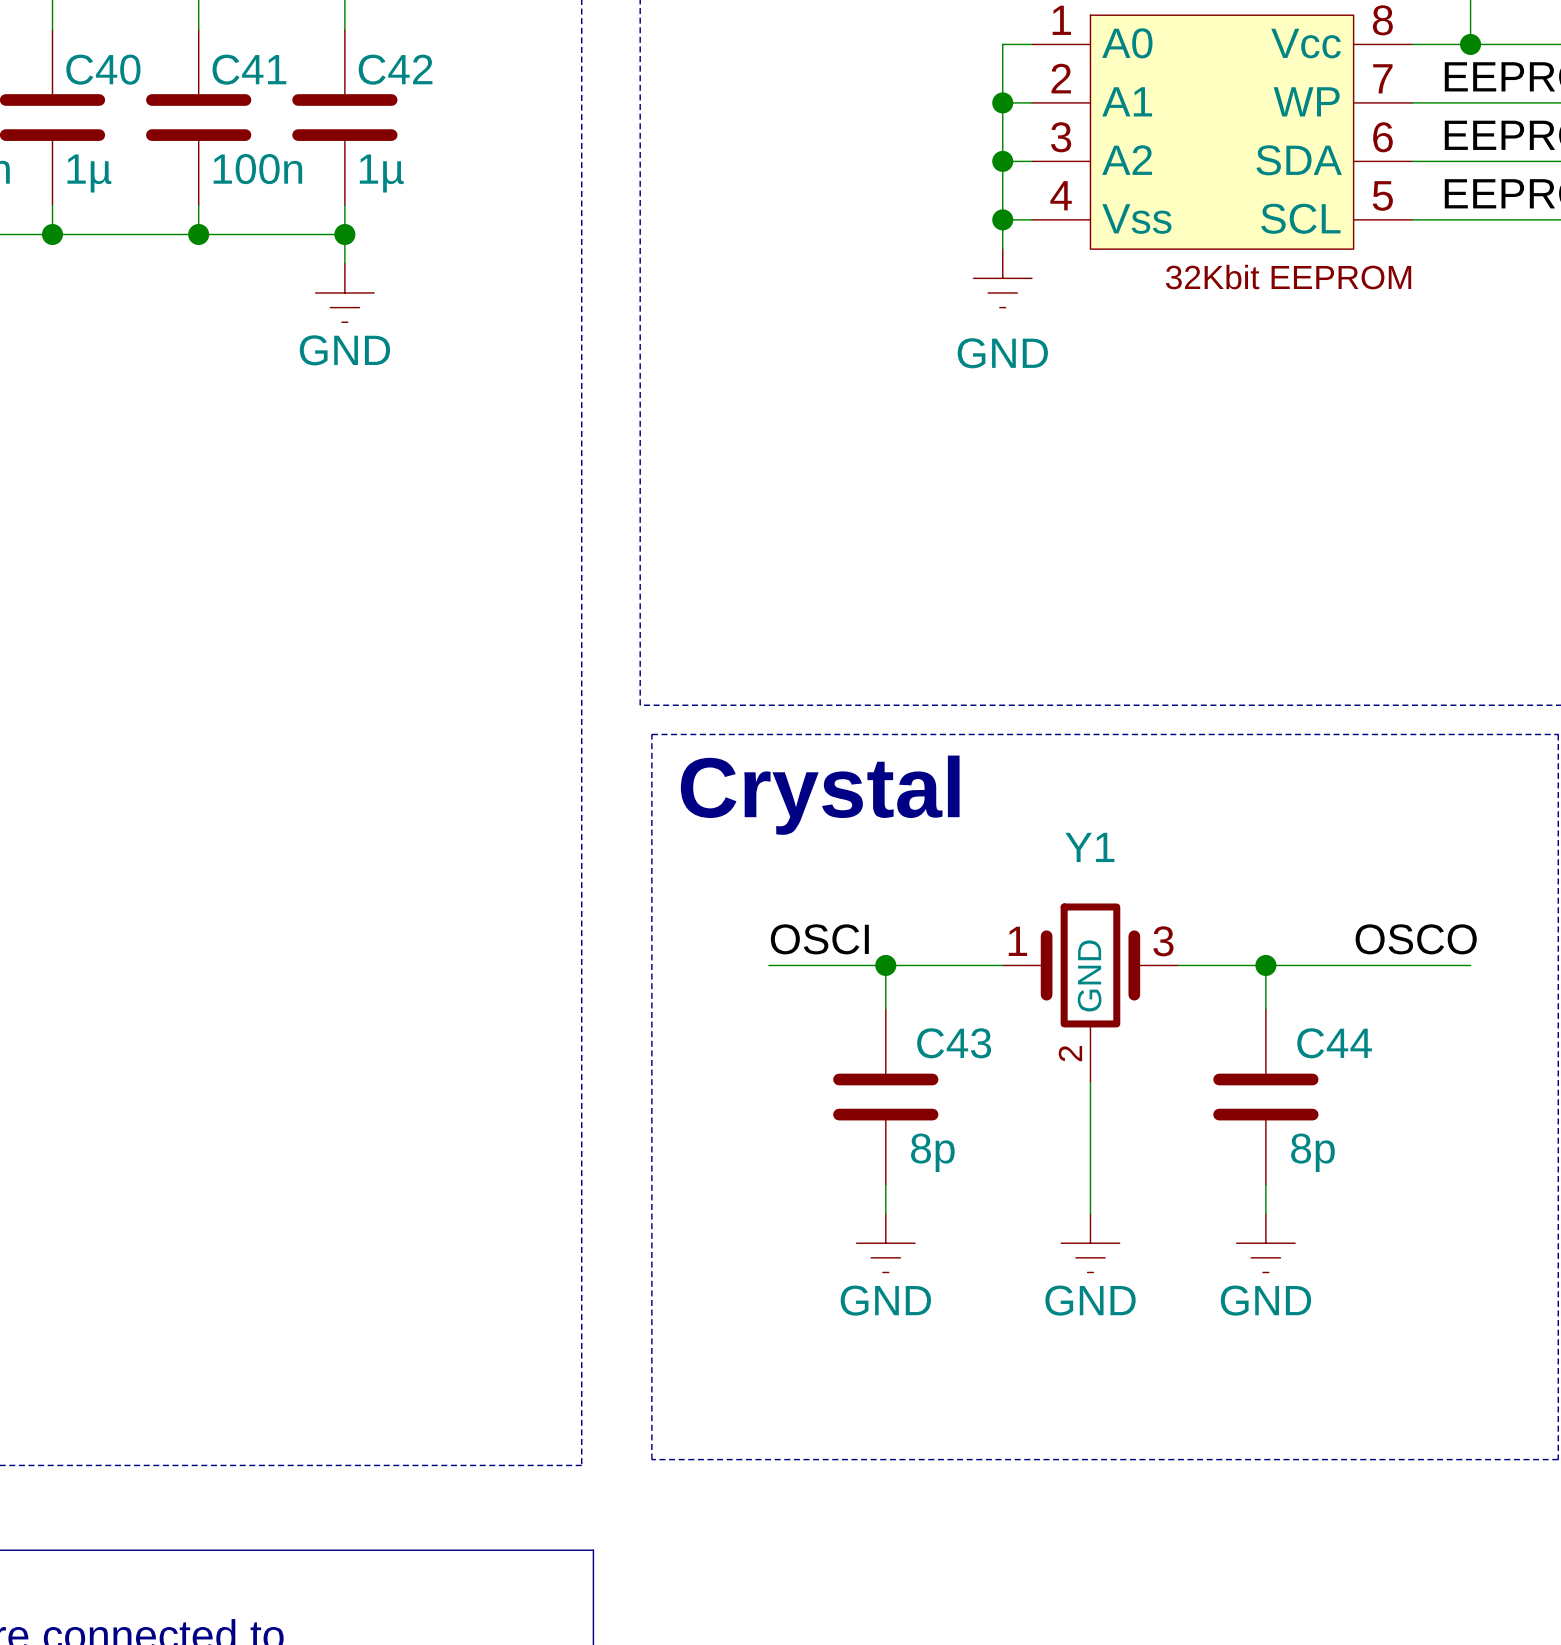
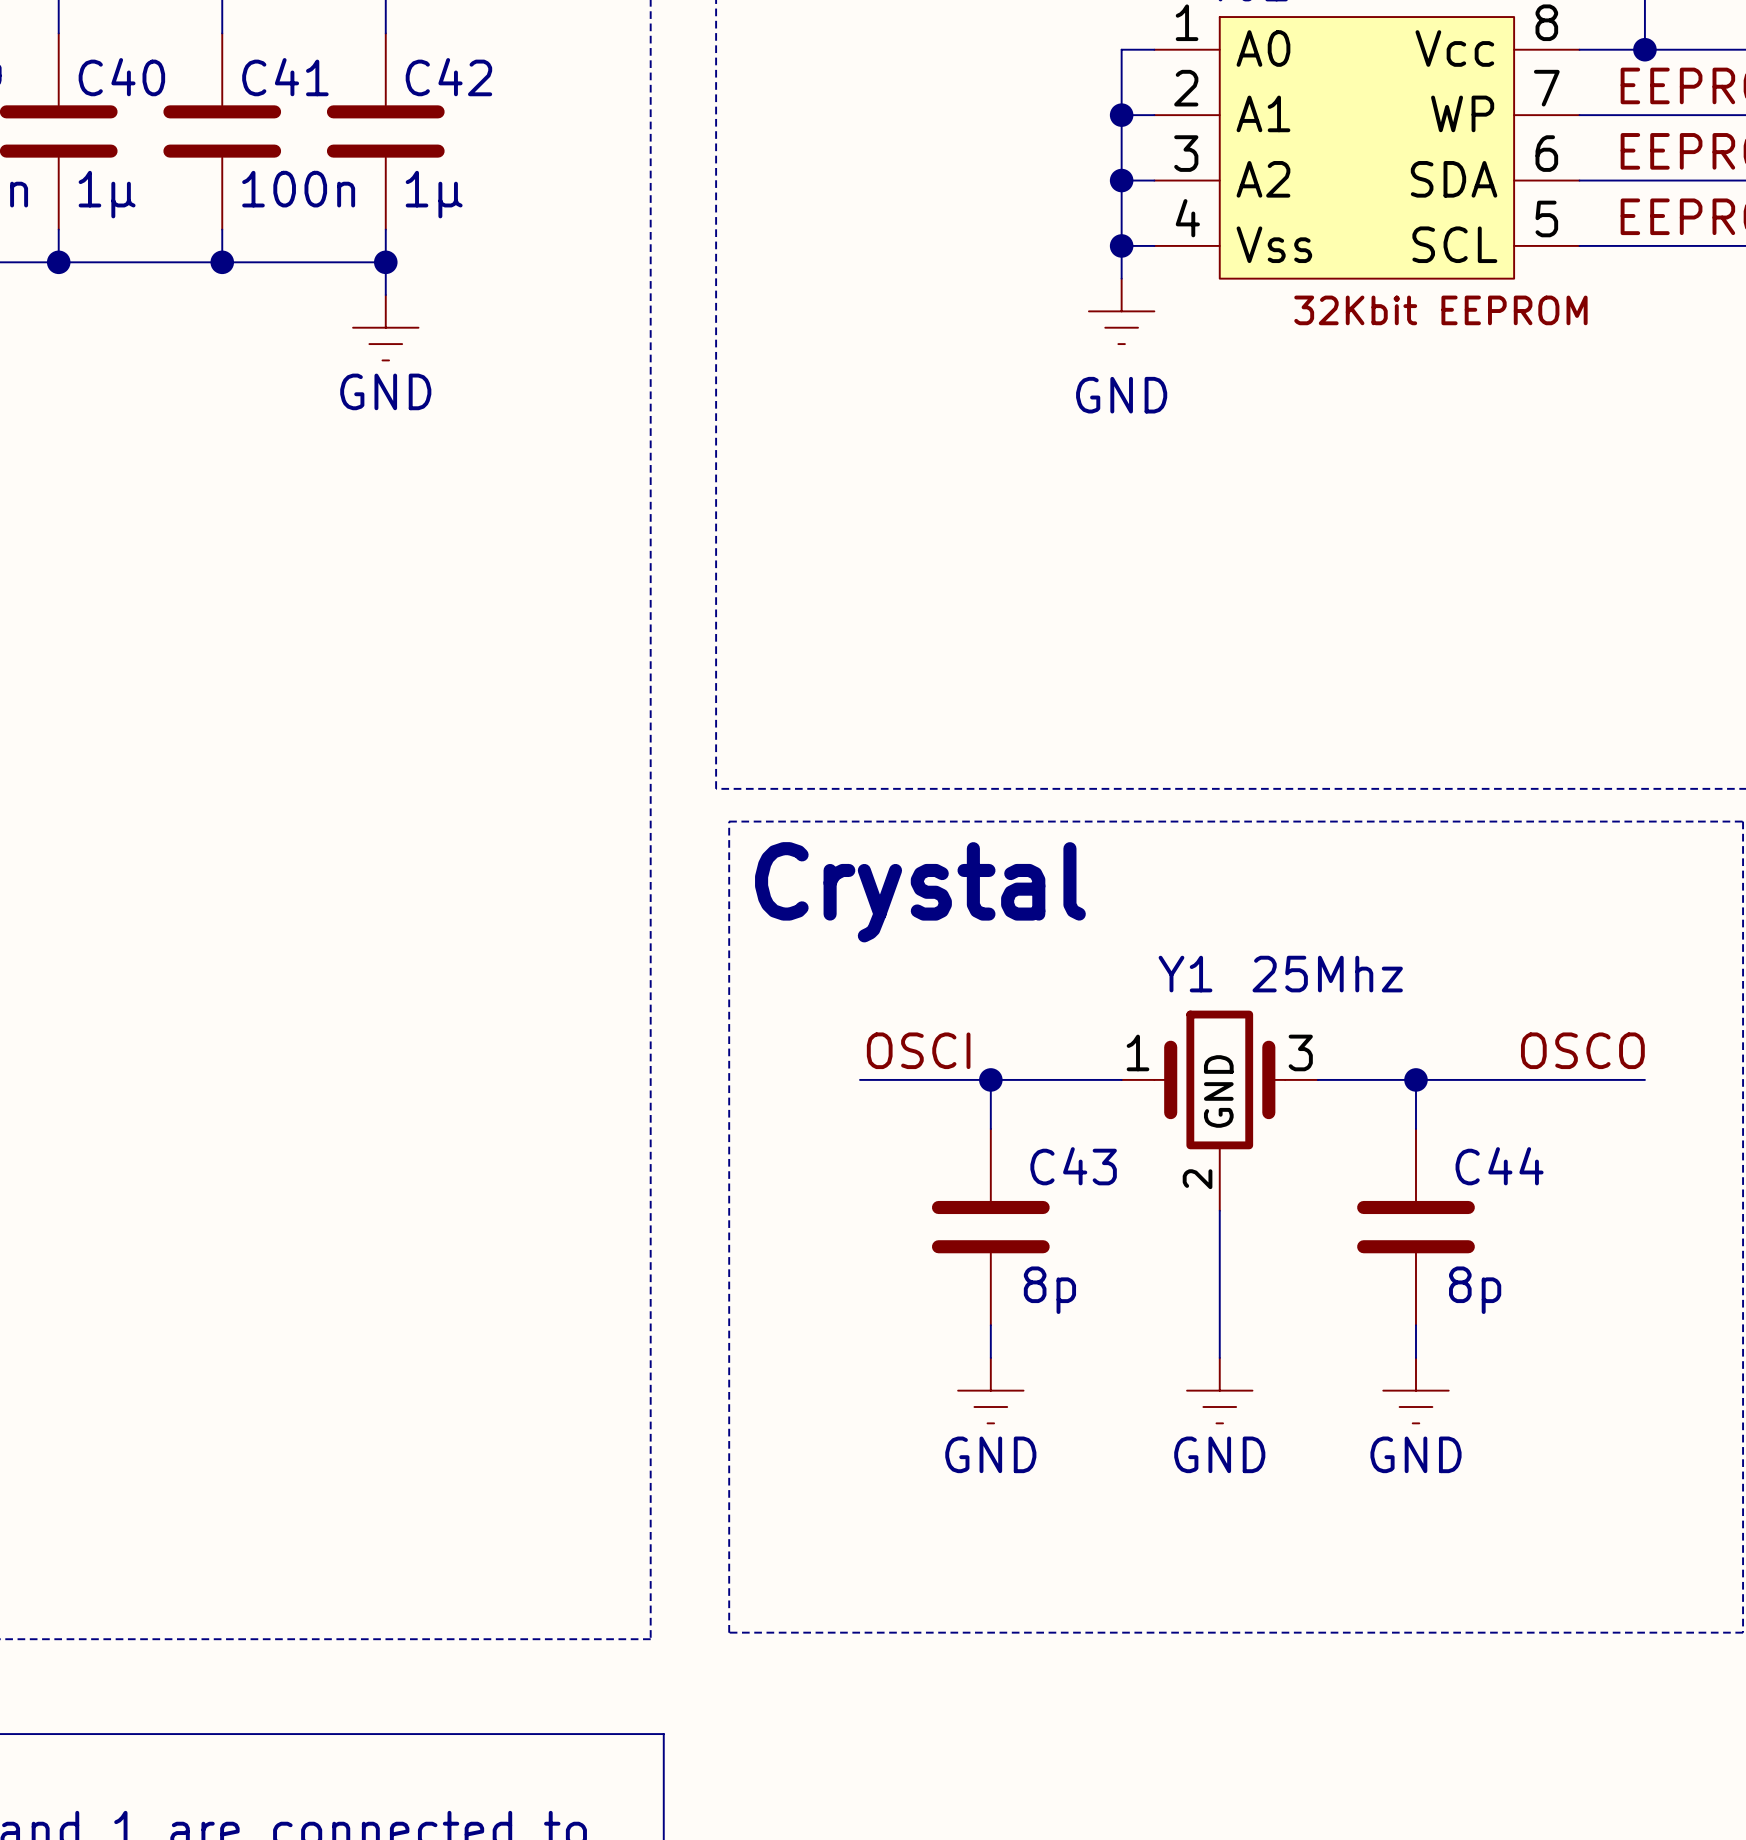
Y1 name position: Y1 (1089, 847) -> Y1 (1185, 974)
Y1 value: none -> 25Mhz (1327, 974)

